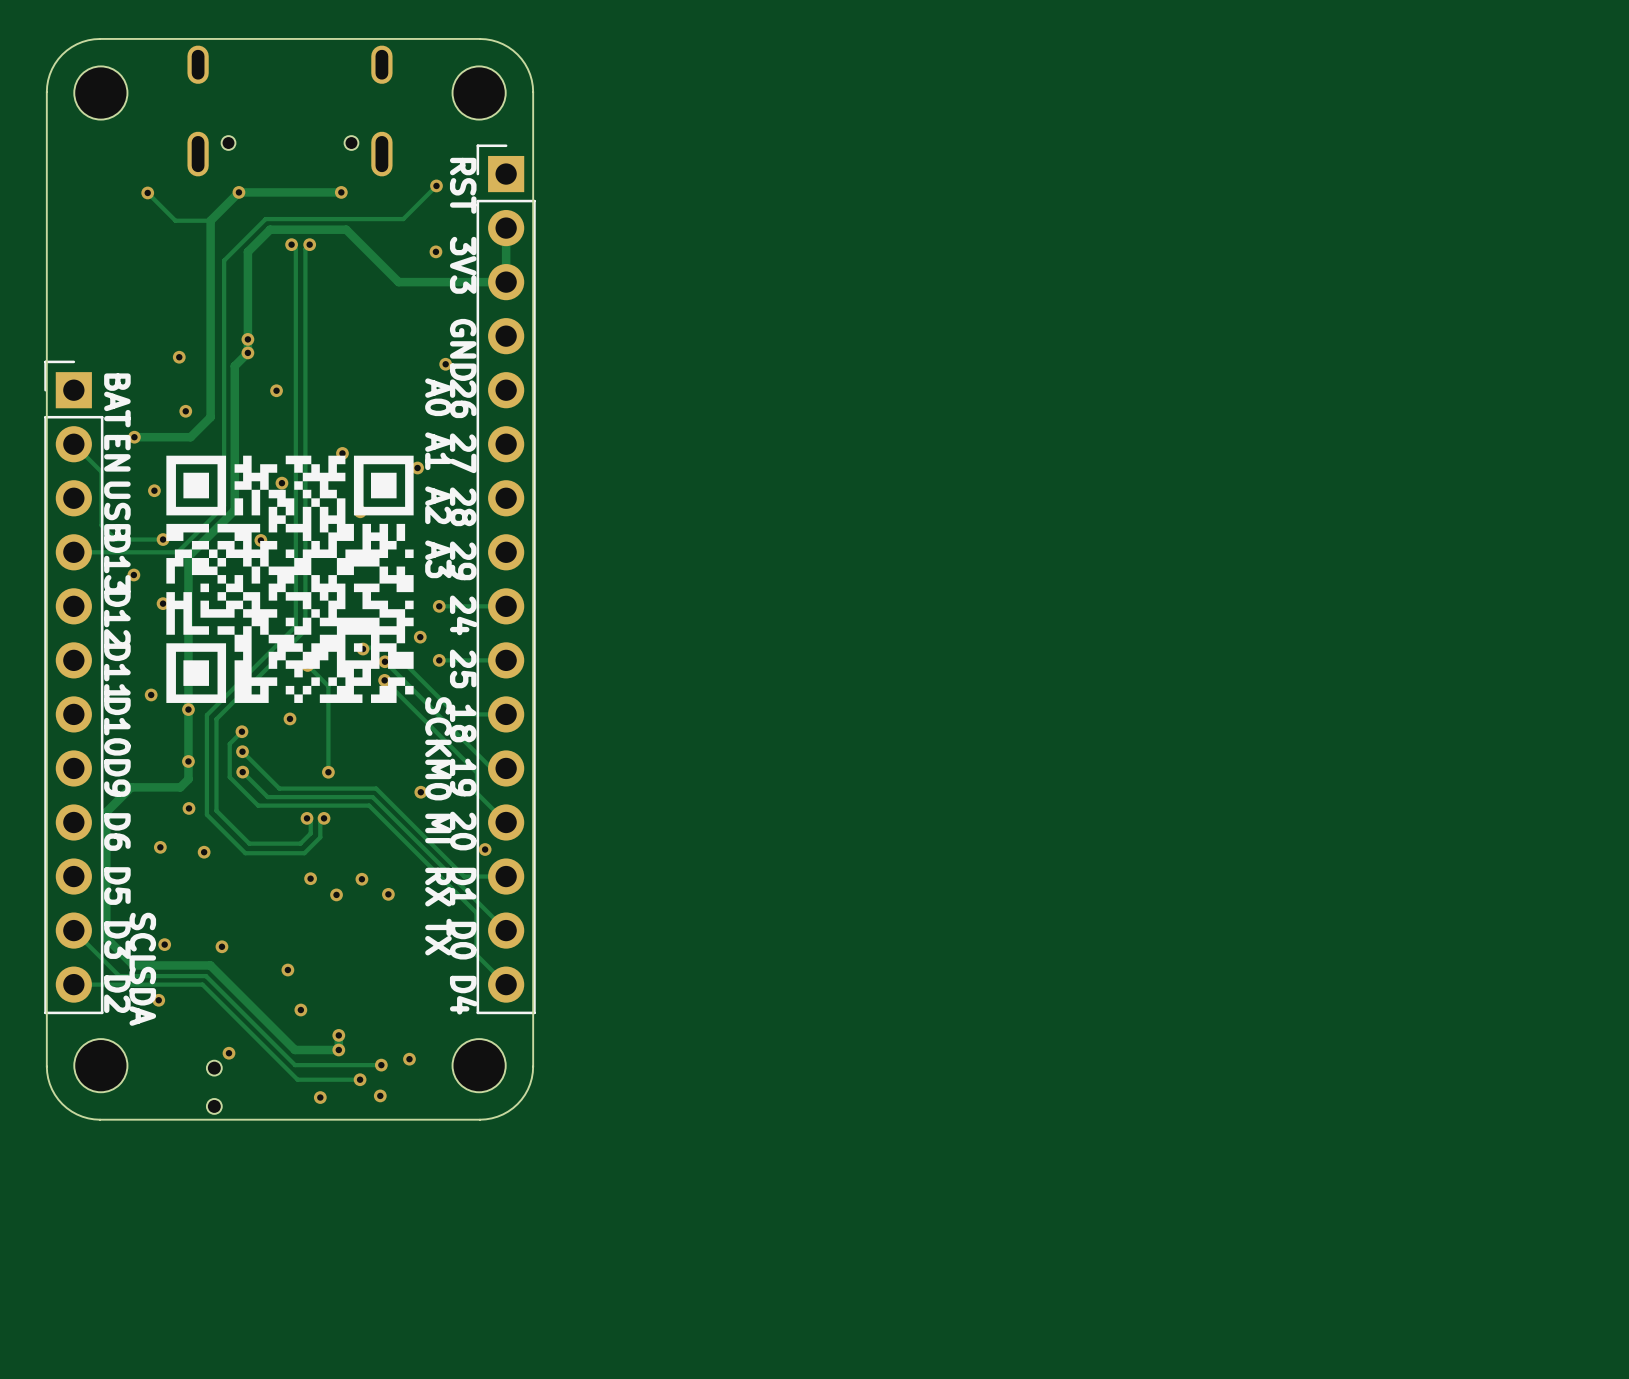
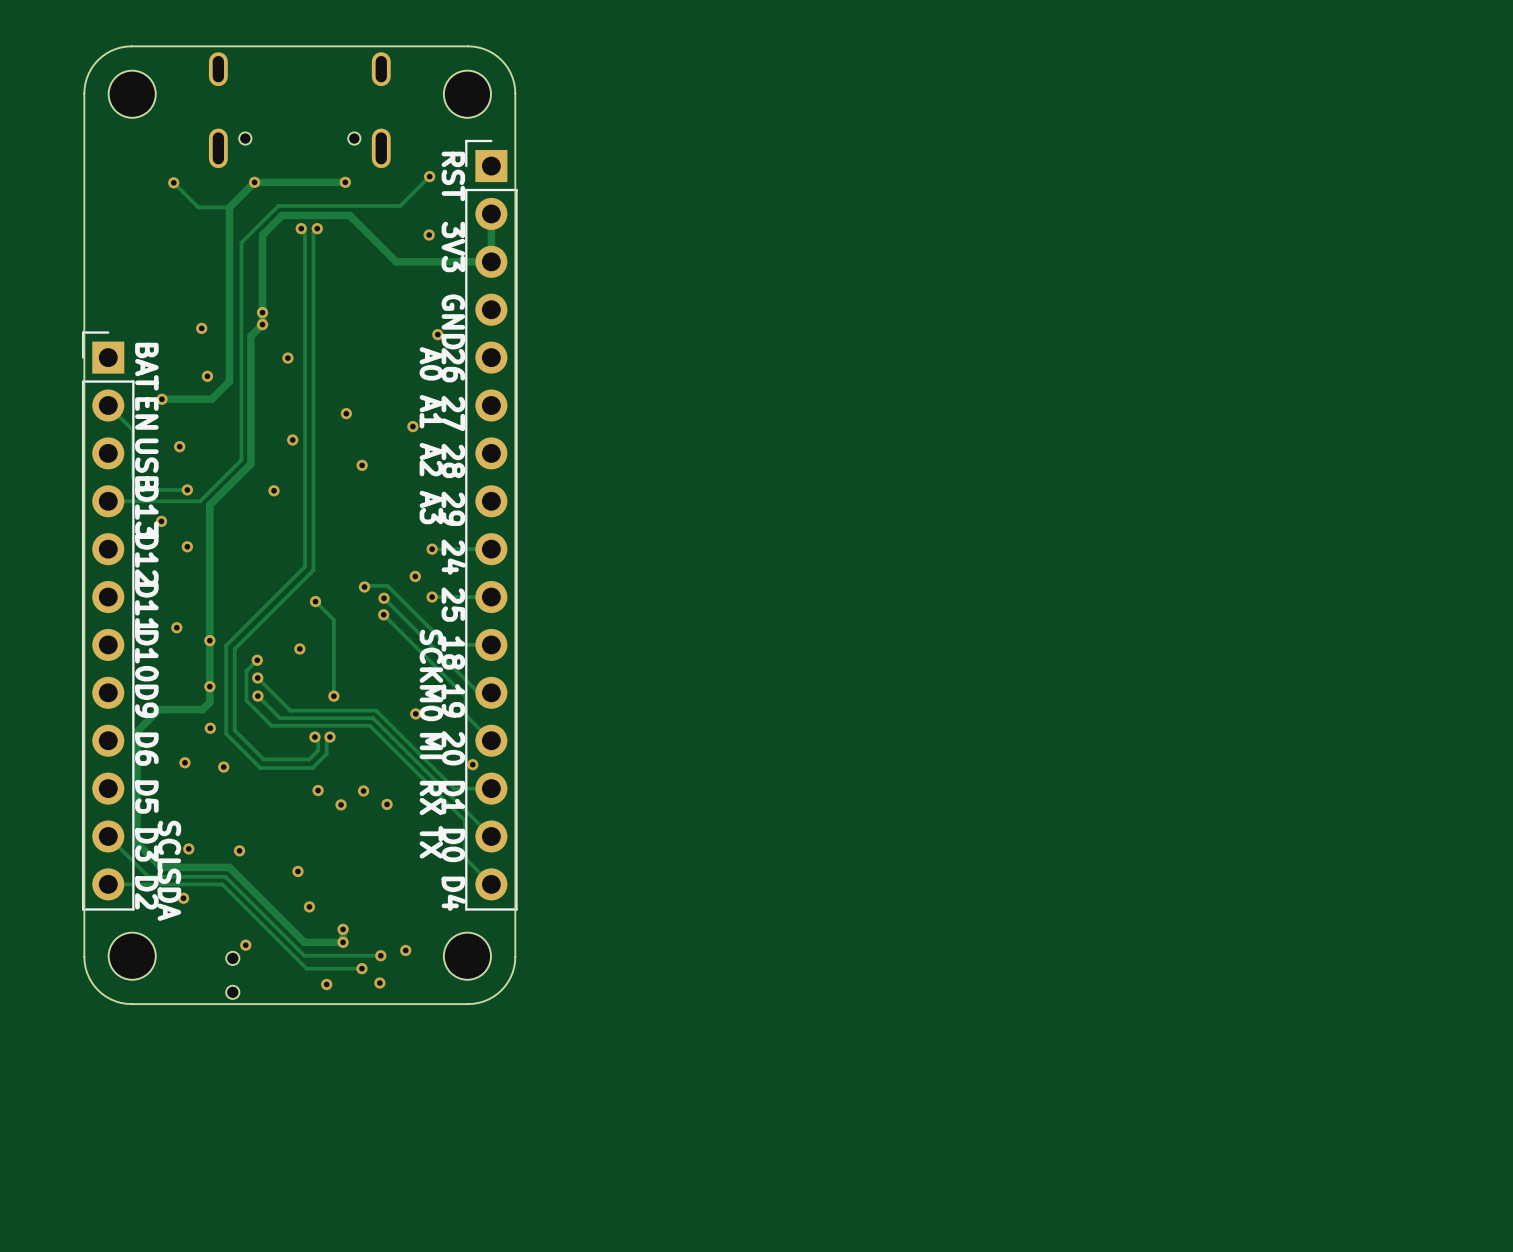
drawing: [166, 455, 414, 703] -> none

